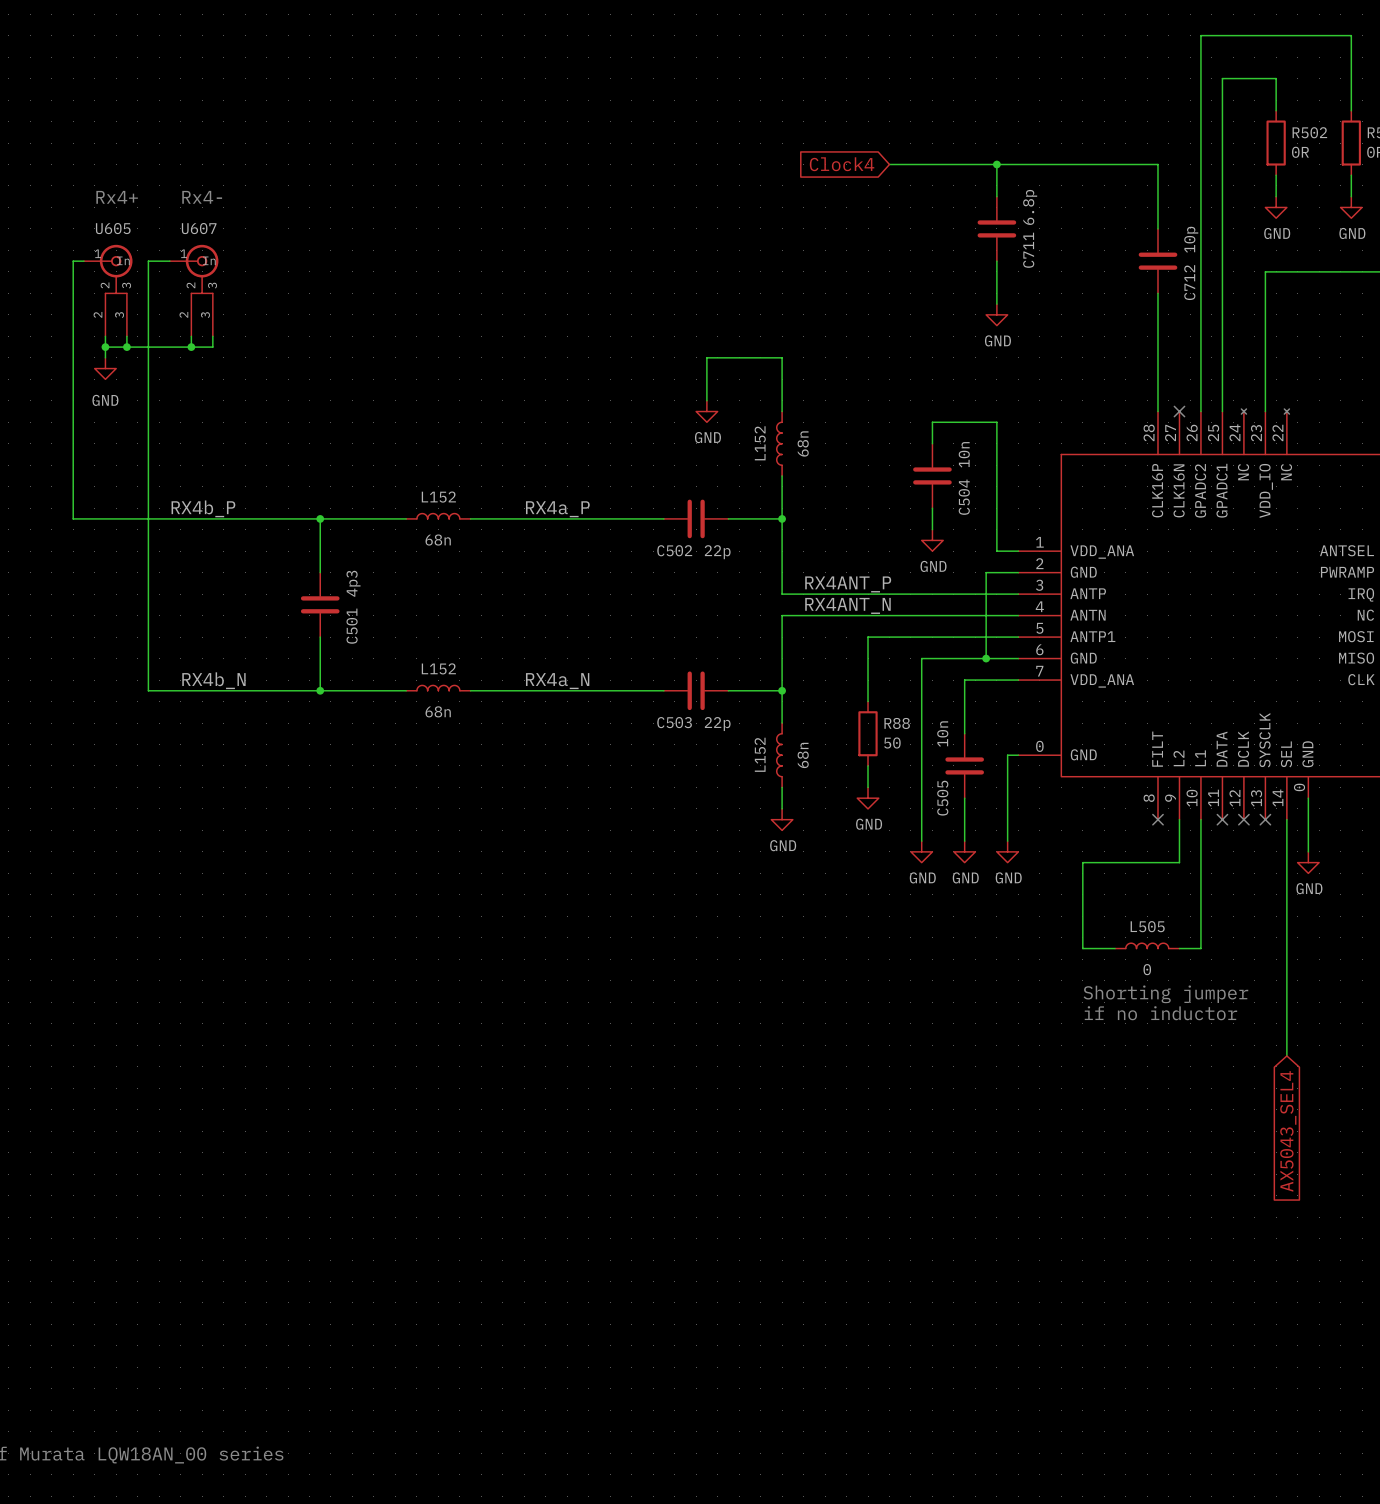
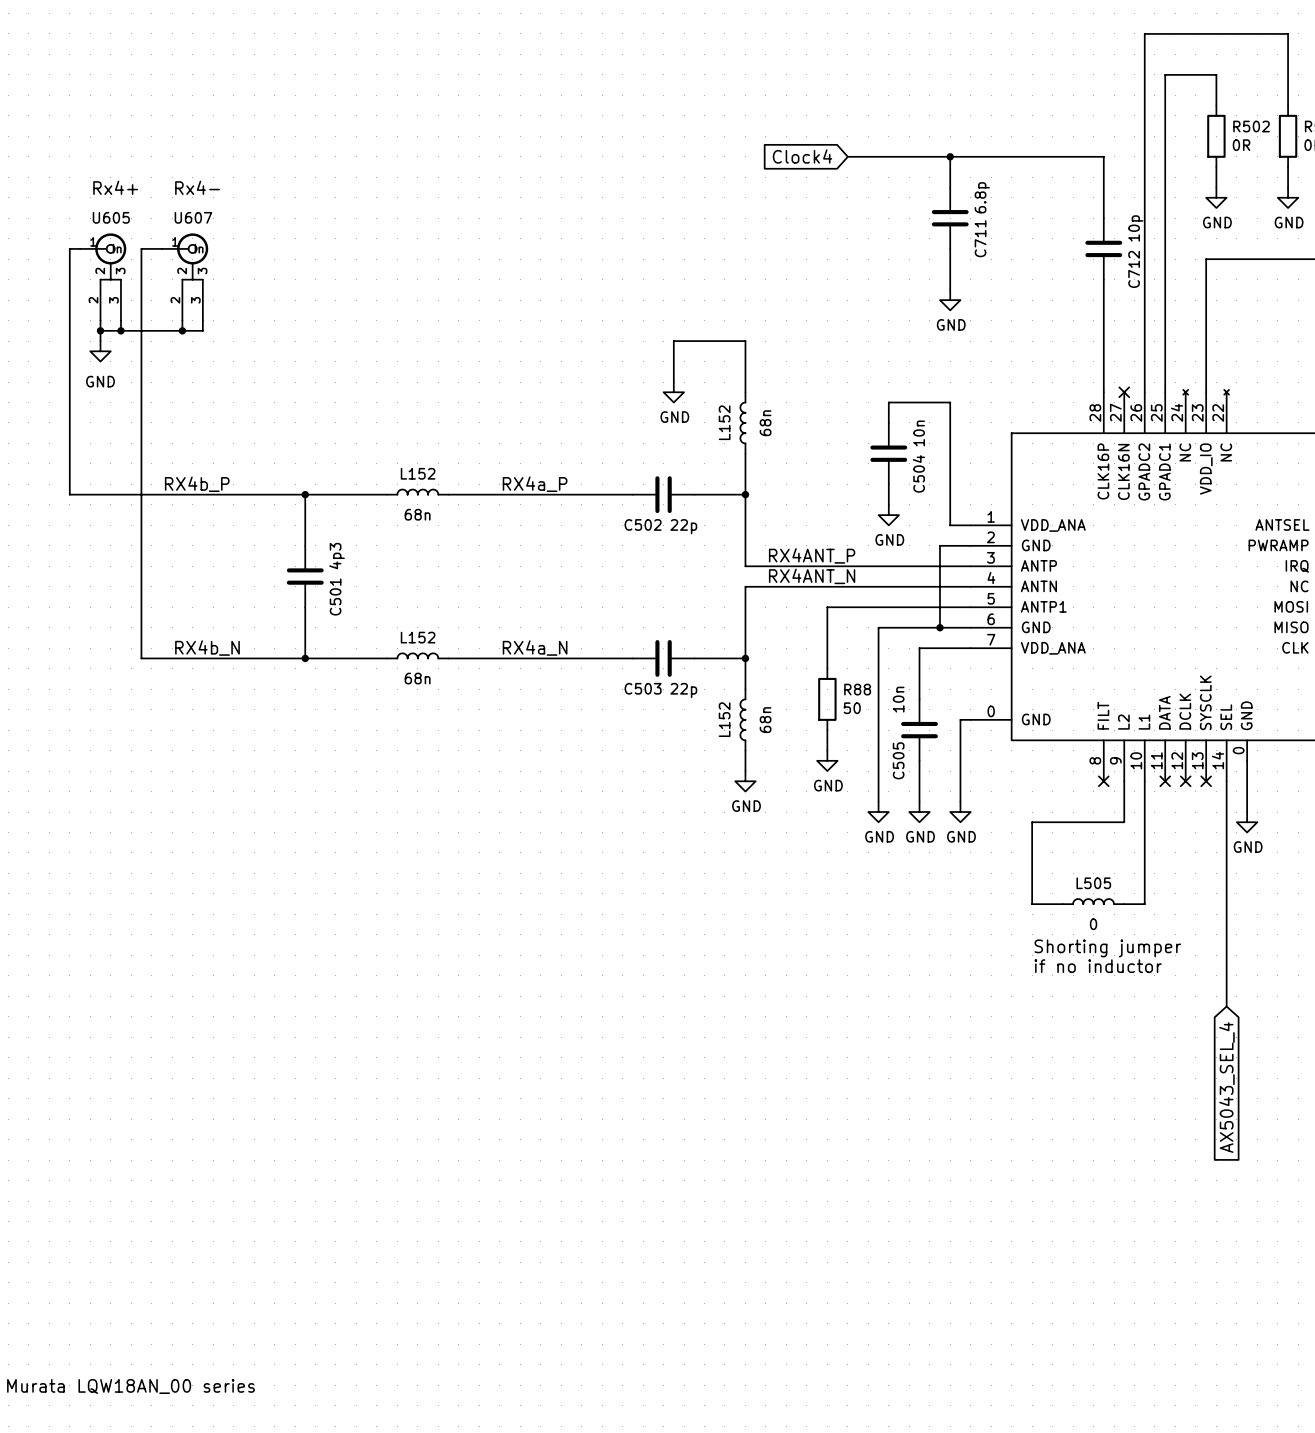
global label: AX5043_SEL4 (1288, 1131) -> AX5043_SEL_4 (1226, 1087)

